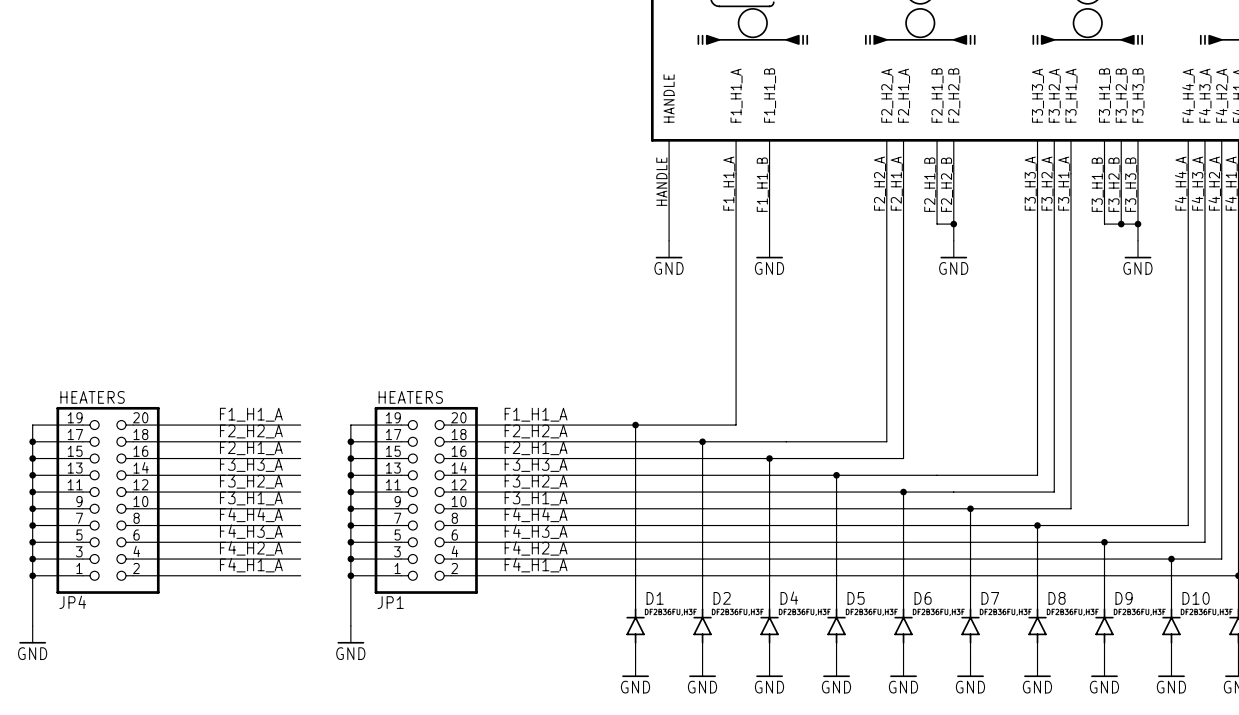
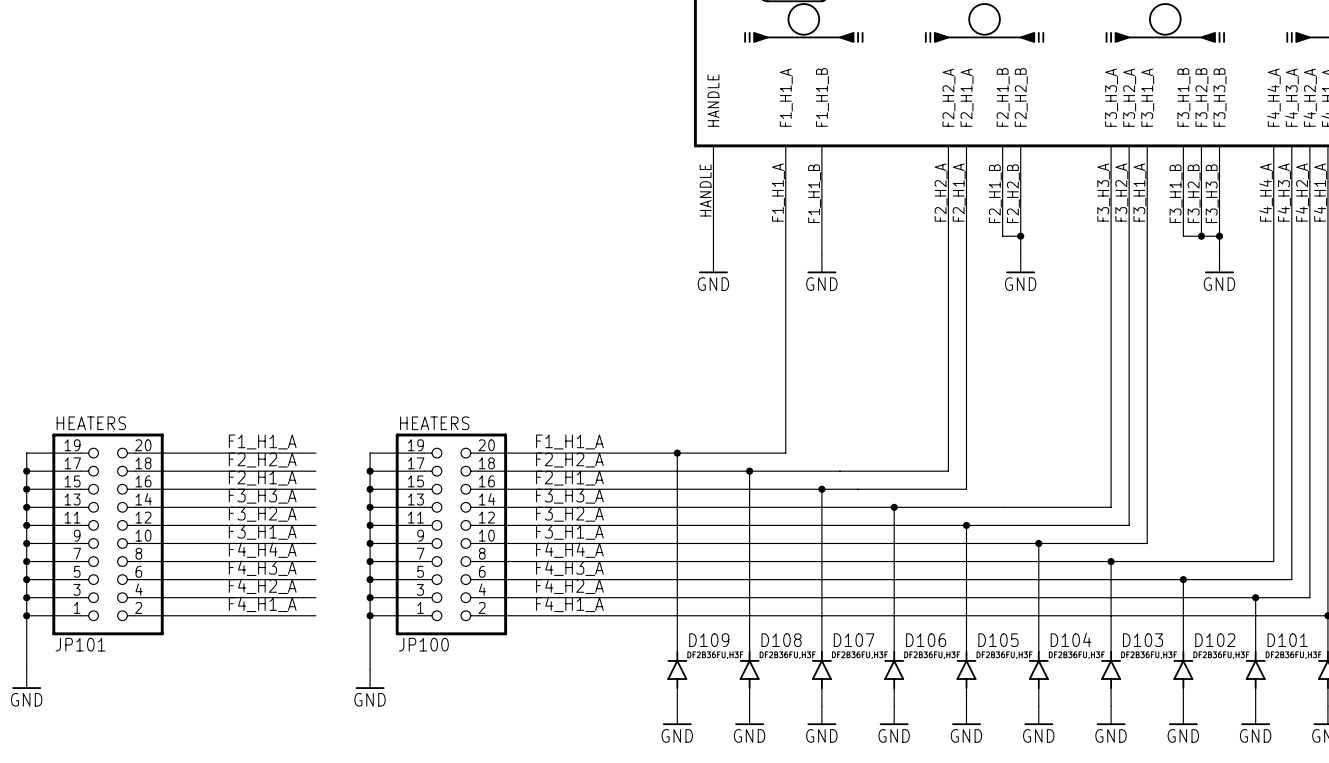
D1 name: D1 (655, 598) -> D109 (709, 640)
D2 name: D2 (722, 598) -> D108 (781, 640)
D4 name: D4 (789, 598) -> D107 (854, 640)
D5 name: D5 (856, 598) -> D106 (926, 640)
D6 name: D6 (923, 598) -> D105 (998, 640)
D7 name: D7 (990, 598) -> D104 (1070, 639)
D8 name: D8 (1057, 598) -> D103 (1143, 640)
D9 name: D9 (1124, 598) -> D102 (1215, 640)
D10 name: D10 (1196, 598) -> D101 (1287, 640)
JP4 name: JP4 (72, 602) -> JP101 (80, 644)
JP1 name: JP1 (390, 602) -> JP100 (423, 644)

